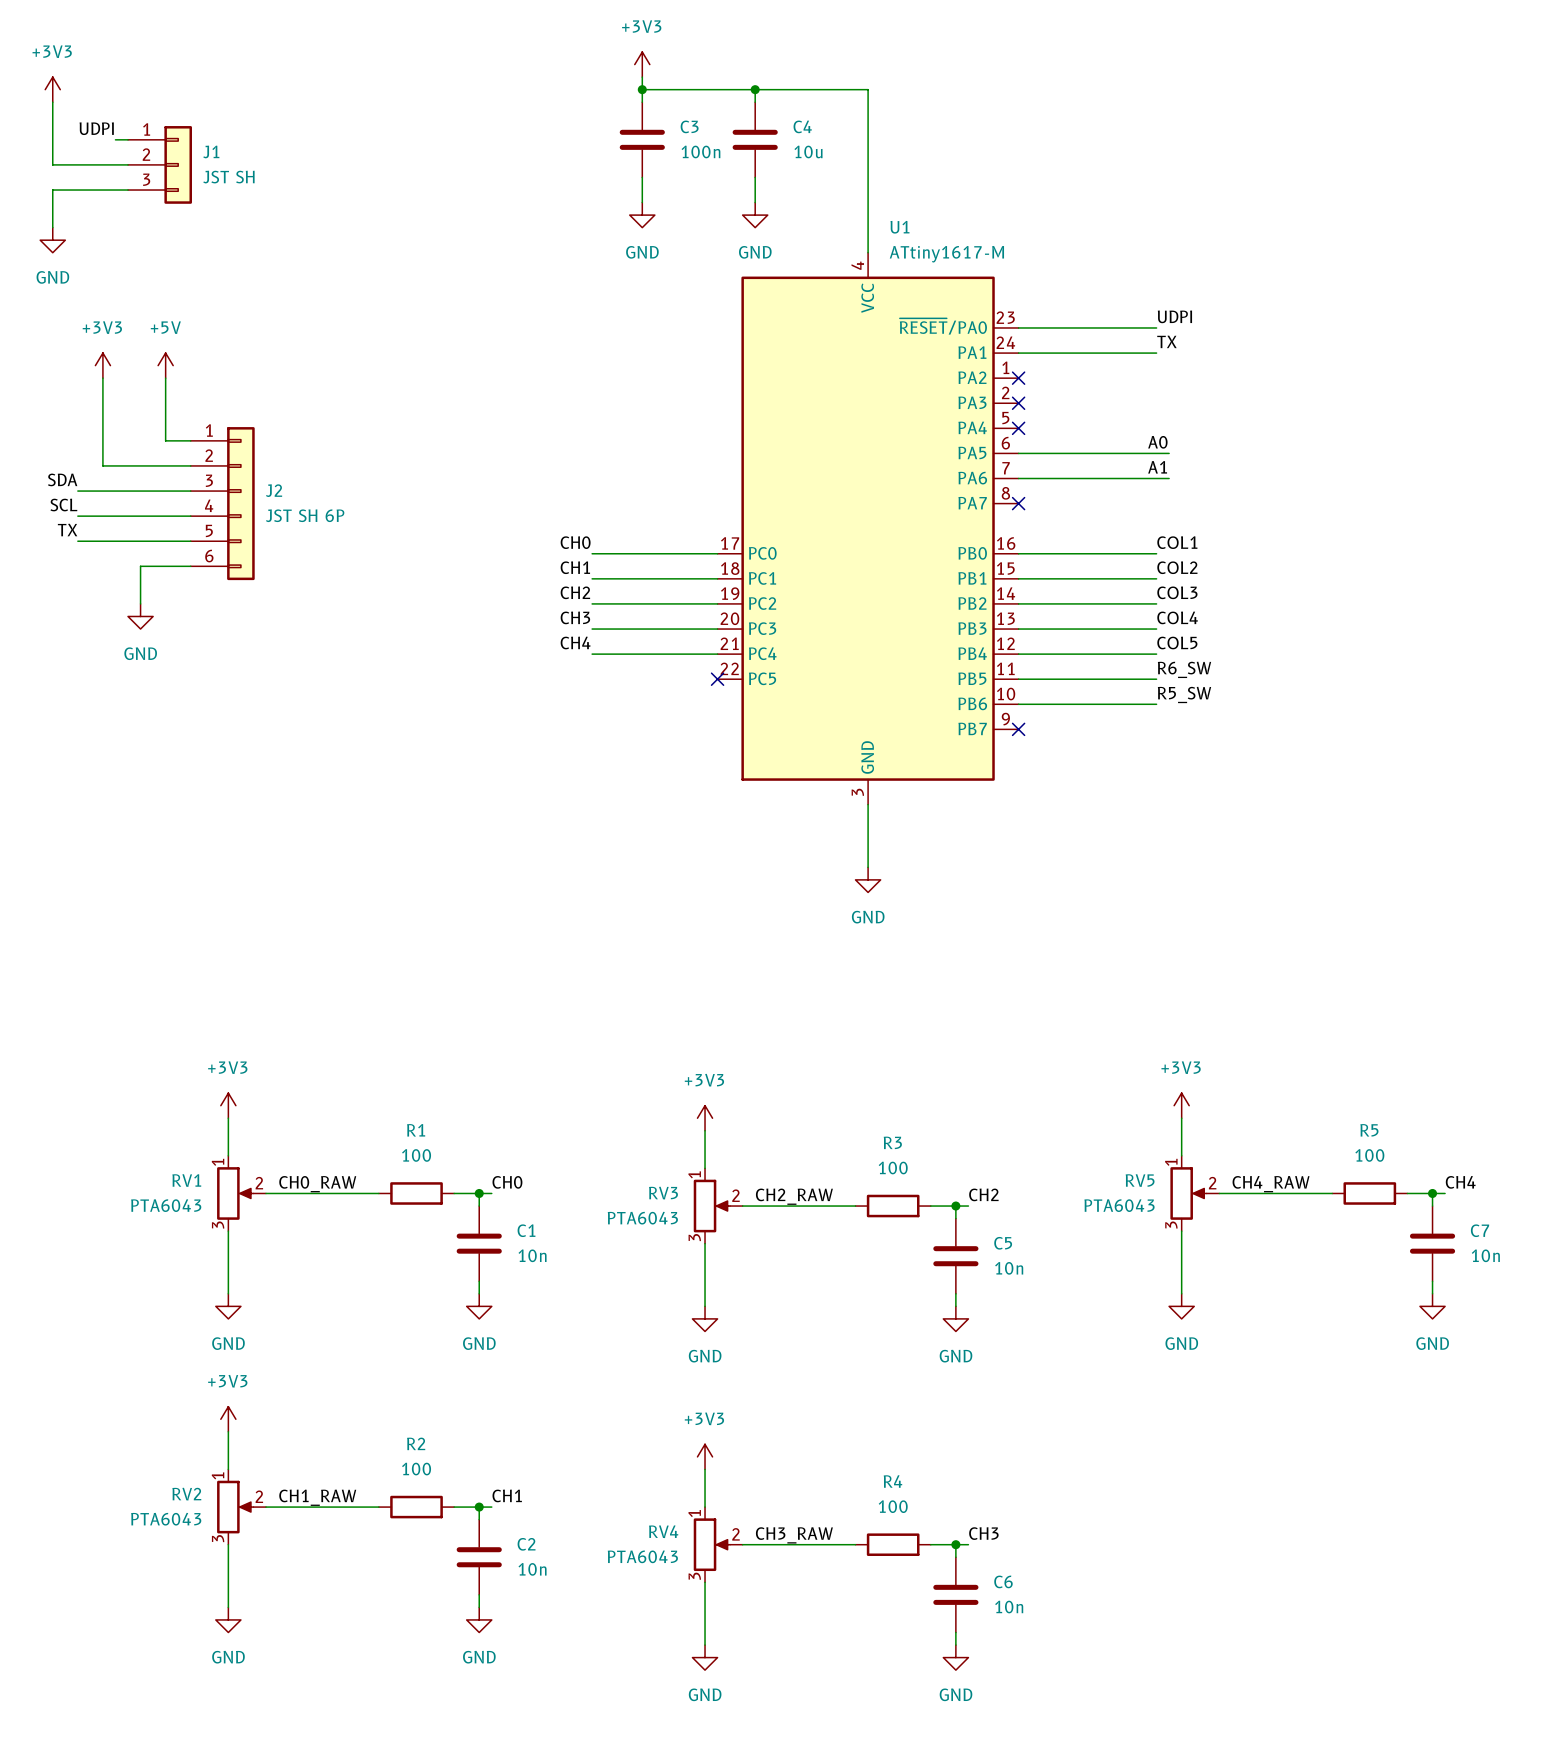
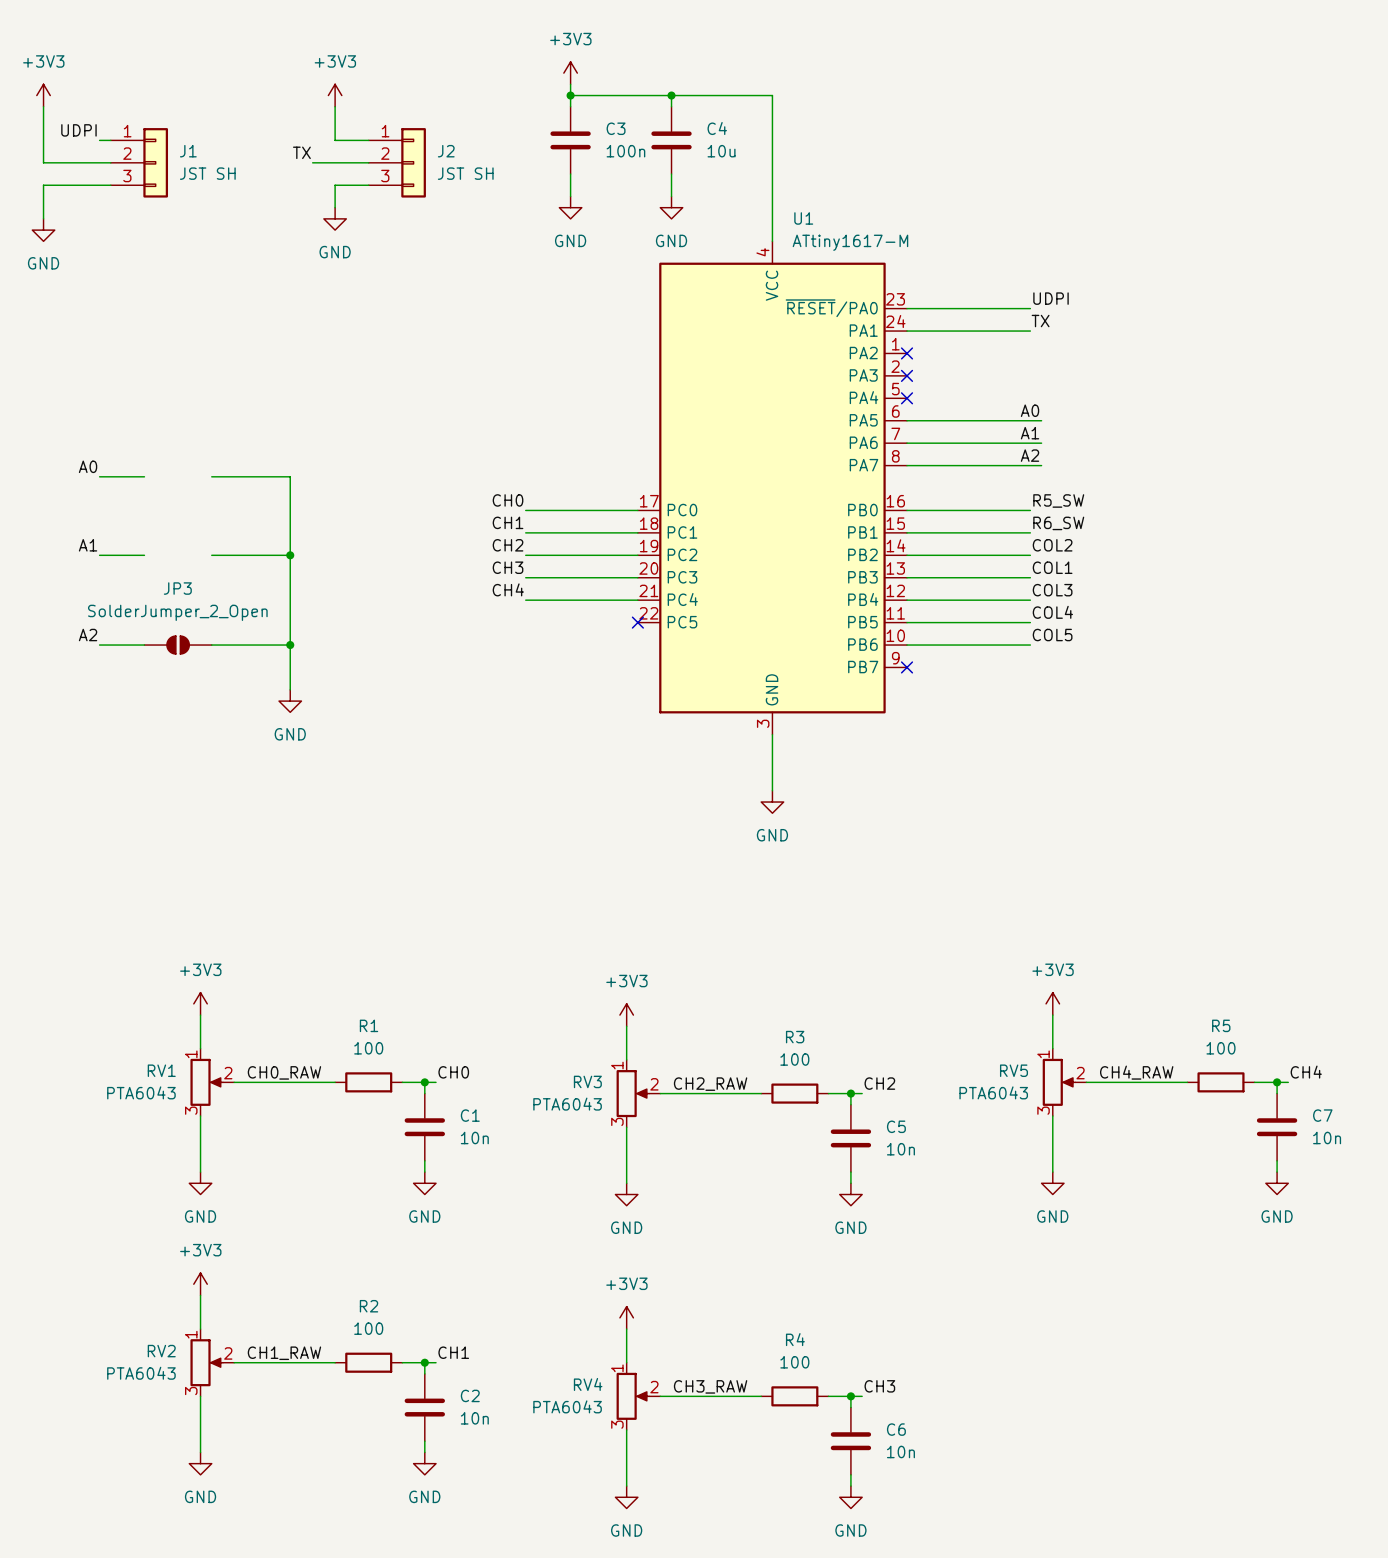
power symbol: none -> +3V3 (335, 95)
wire: none -> (335, 106) (335, 140) (368, 140)
label: none -> TX (301, 152)
wire: none -> (312, 162) (368, 162)
wire: none -> (368, 185) (335, 185) (335, 207)
power symbol: none -> GND (335, 218)
power symbol: +3V3 (102, 365) -> none
power symbol: +5V (165, 365) -> none
wire: (102, 378) (102, 465) (190, 465) -> none
wire: (165, 378) (165, 440) (190, 440) -> none
J2 symbol: [190, 427, 255, 581] -> [368, 128, 426, 198]
label: SDA (62, 479) -> none
wire: (77, 491) (190, 491) -> none
label: none -> A2 (1030, 455)
wire: none -> (907, 465) (1041, 465)
no-connect mark: (1018, 503) -> none
label: SCL (63, 505) -> none
label: none -> A0 (88, 466)
J2 value: JST SH 6P (305, 515) -> JST SH (465, 173)
wire: (77, 516) (115, 516) -> none
wire: (165, 516) (190, 516) -> none
wire: none -> (211, 476) (290, 476) (290, 689)
label: TX (67, 530) -> none
wire: (77, 541) (190, 541) -> none
label: COL1 (1177, 542) -> R5_SW (1058, 500)
wire: (190, 566) (140, 566) (140, 603) -> none
label: COL2 (1177, 567) -> R6_SW (1058, 523)
label: none -> A1 (88, 545)
label: COL3 (1177, 592) -> COL2 (1052, 545)
wire: none -> (99, 555) (144, 555)
wire: none -> (211, 555) (290, 555)
junction: none -> (290, 555)
power symbol: GND (140, 616) -> none
label: COL4 (1177, 617) -> COL1 (1052, 567)
label: COL5 (1177, 642) -> COL3 (1052, 590)
label: R6_SW (1184, 669) -> COL4 (1052, 612)
label: none -> A2 (88, 635)
label: R5_SW (1184, 694) -> COL5 (1052, 635)
wire: none -> (99, 645) (144, 645)
JP3: none -> SolderJumper_2_Open (178, 645)
wire: none -> (211, 645) (290, 645)
junction: none -> (290, 645)
power symbol: none -> GND (290, 701)

